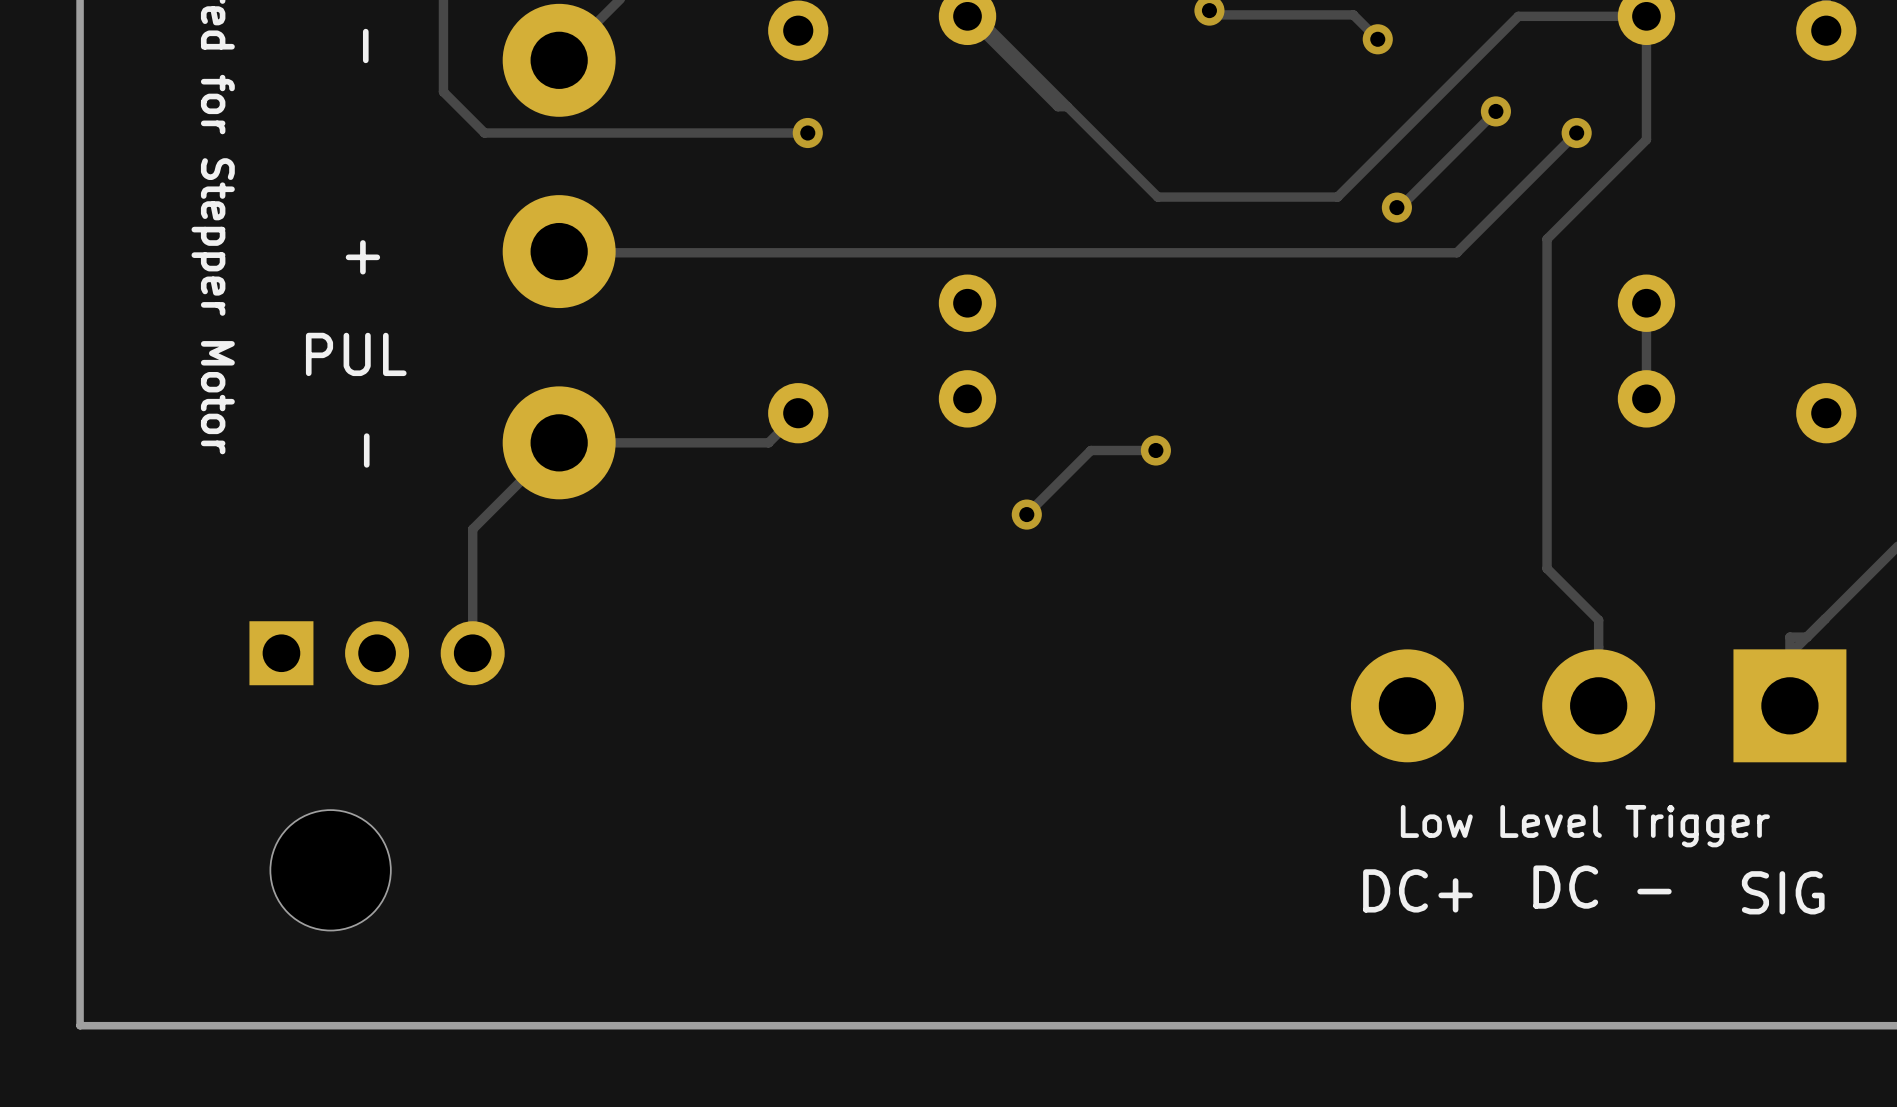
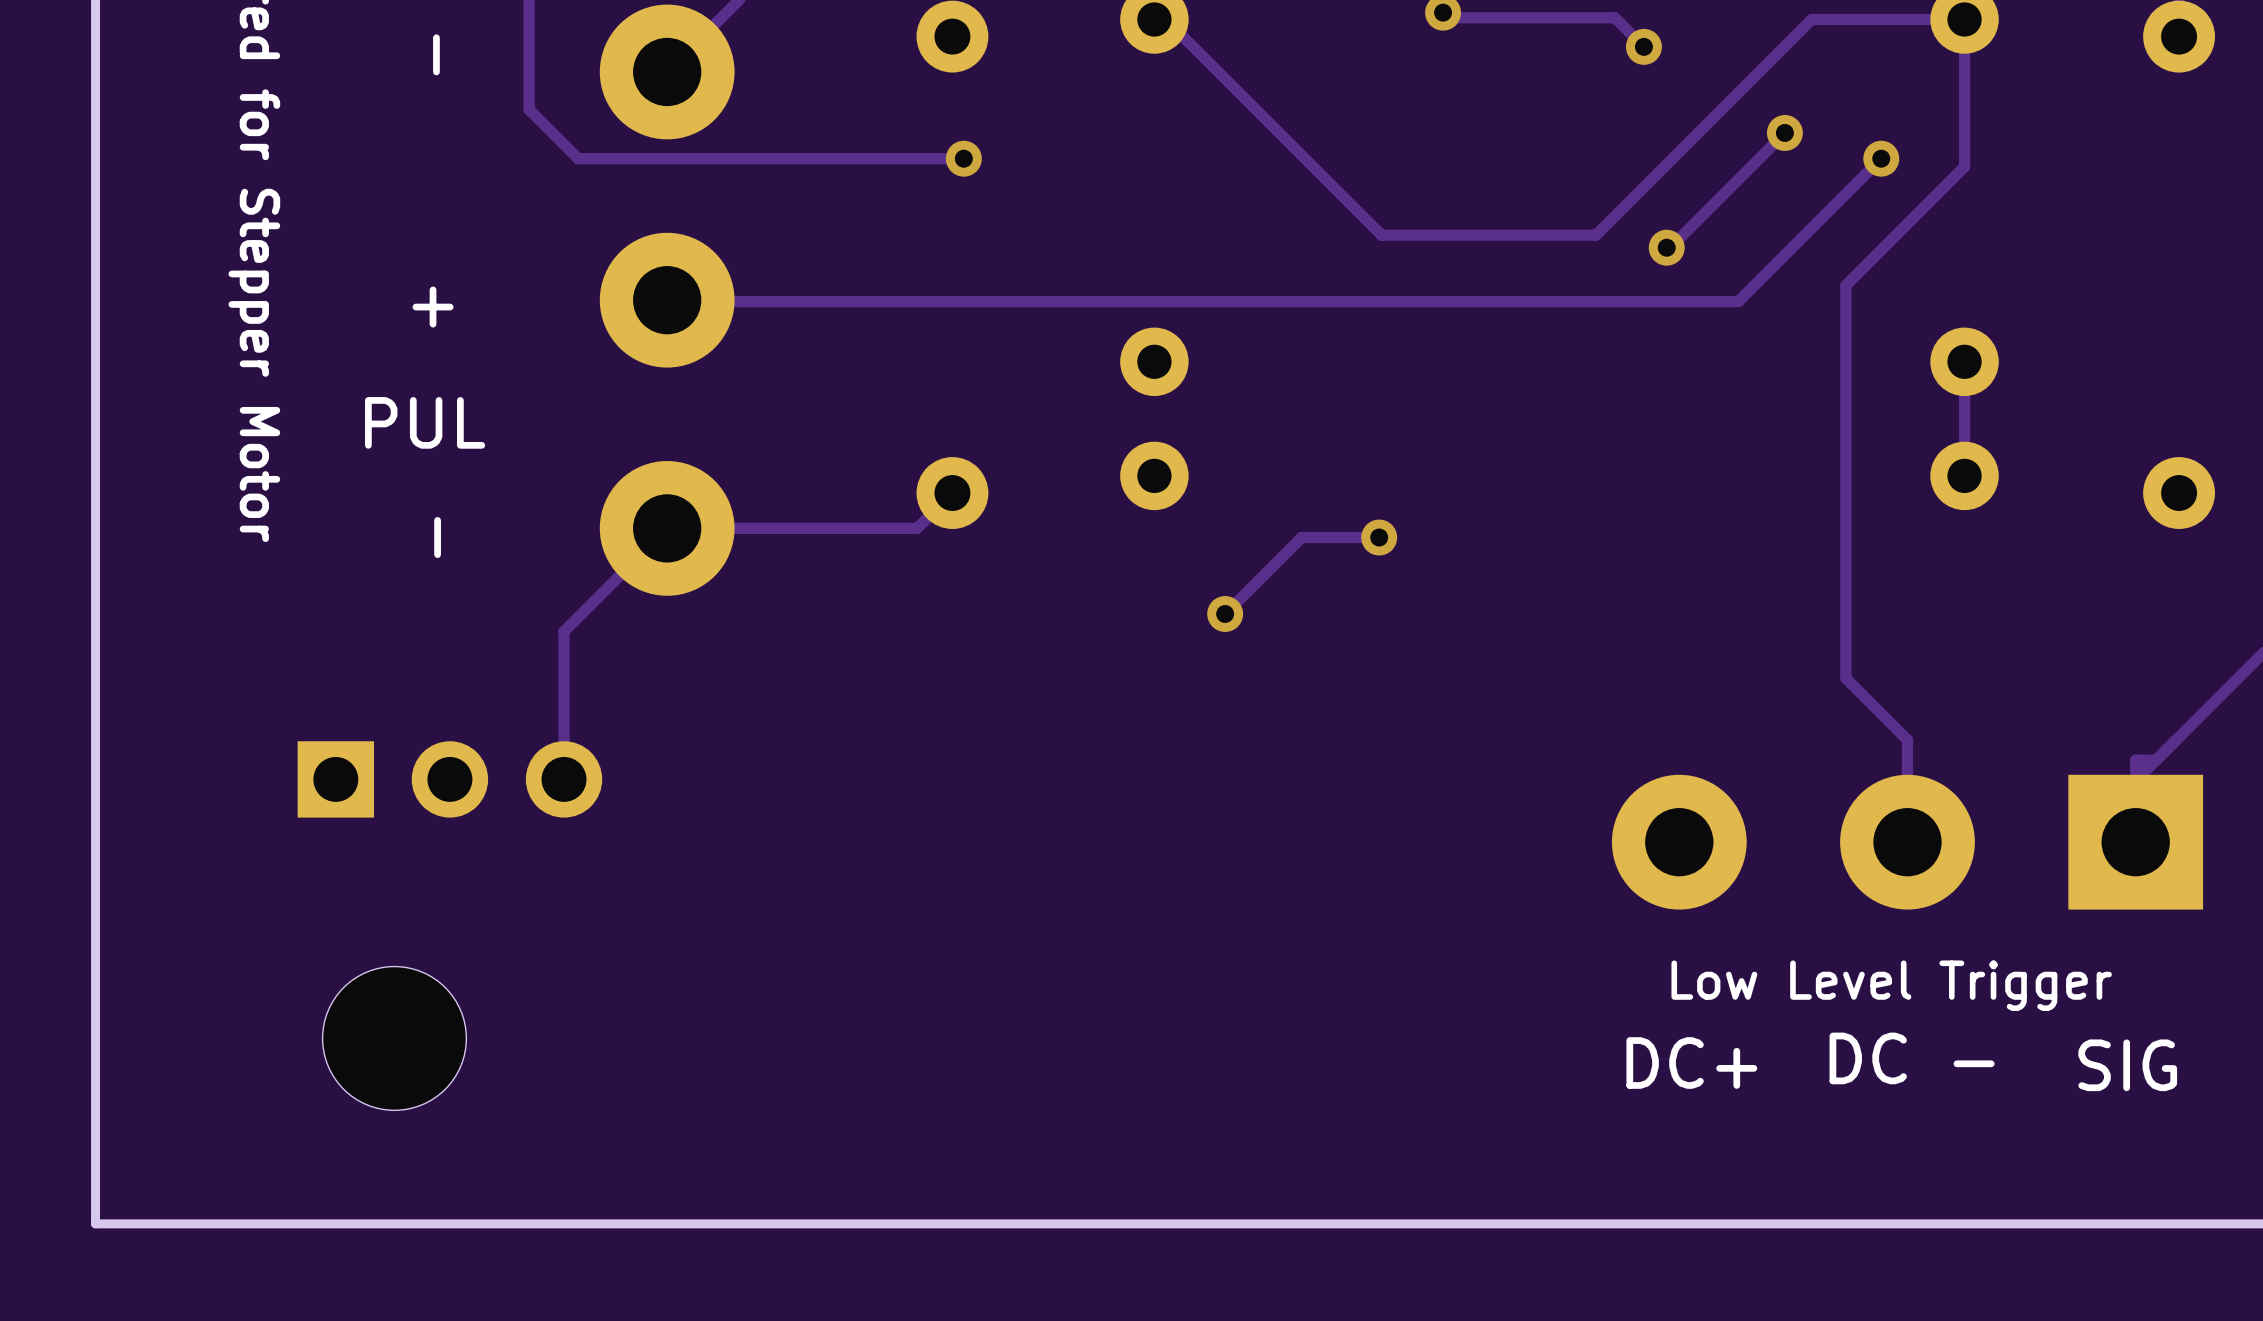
track: (967, 16) (1057, 106) (1067, 106) -> none

